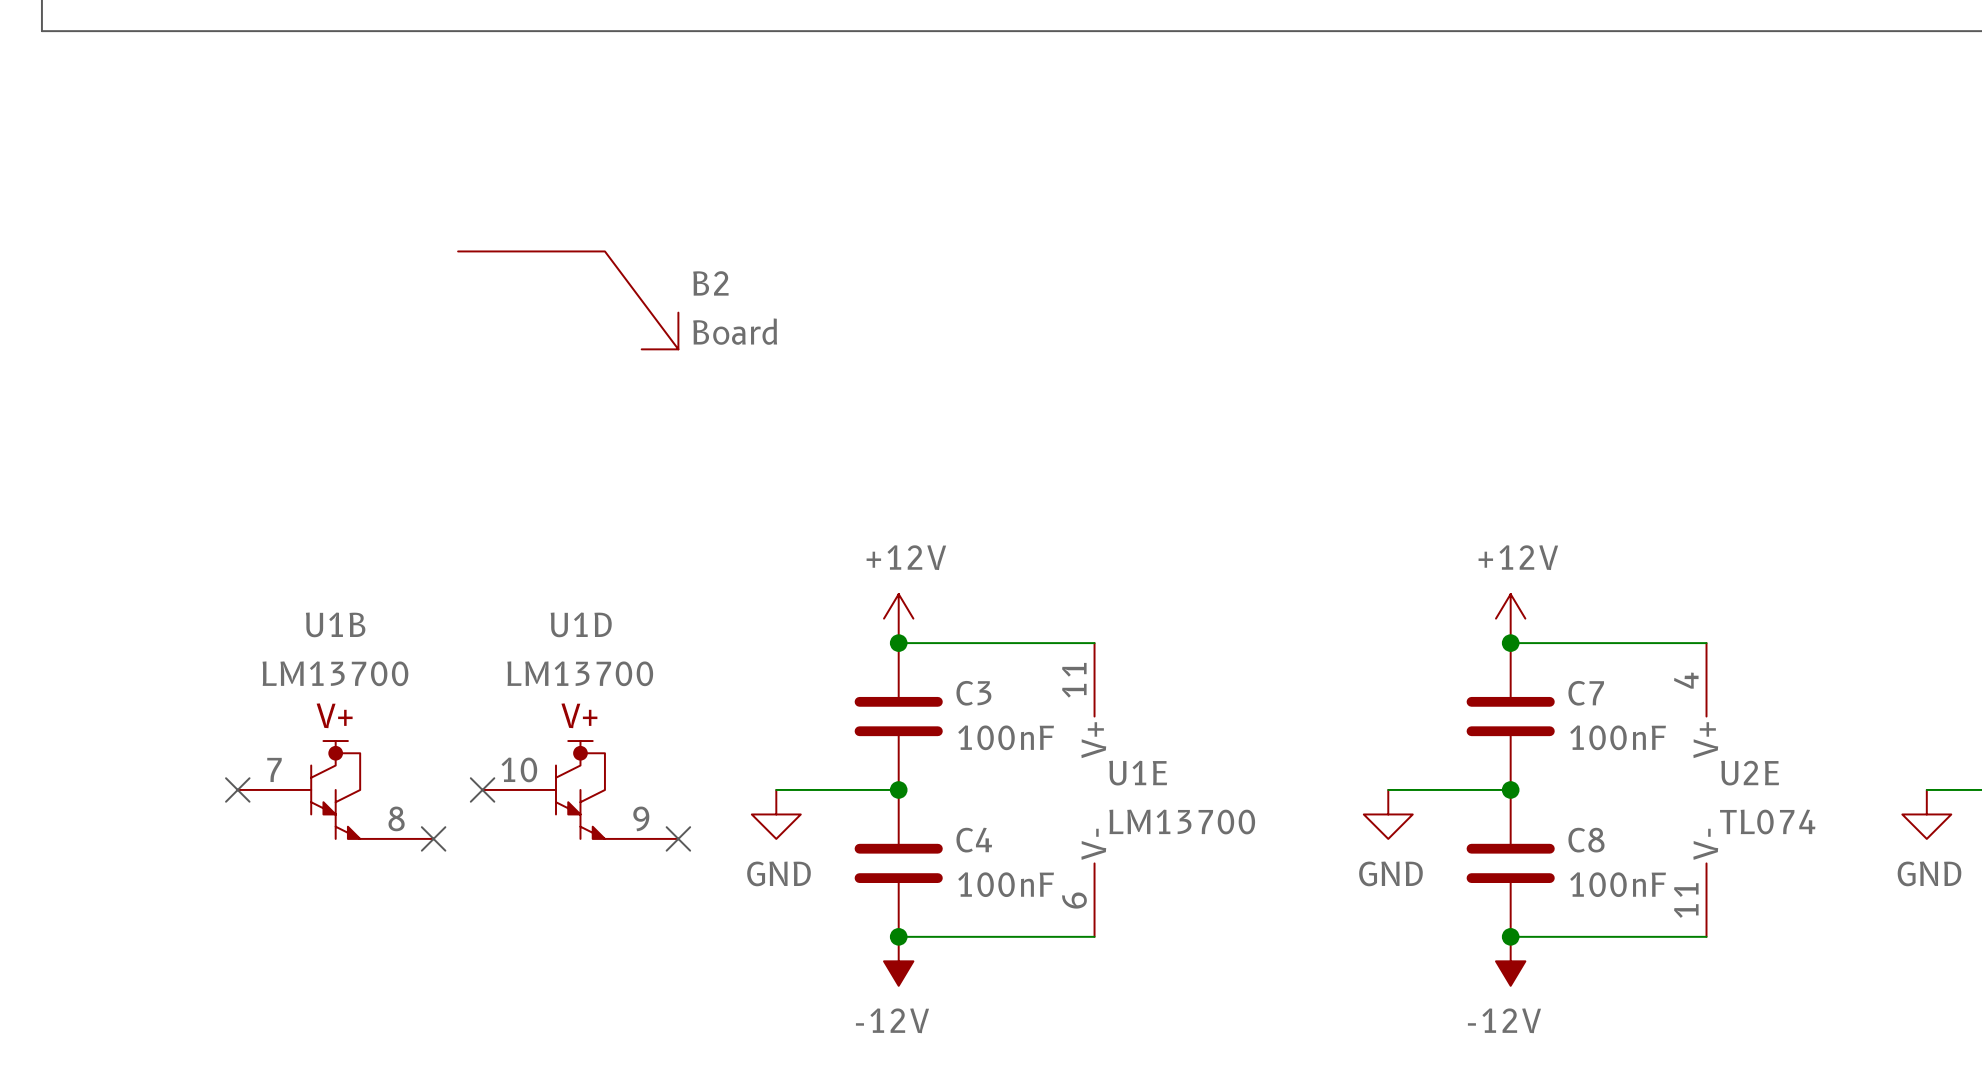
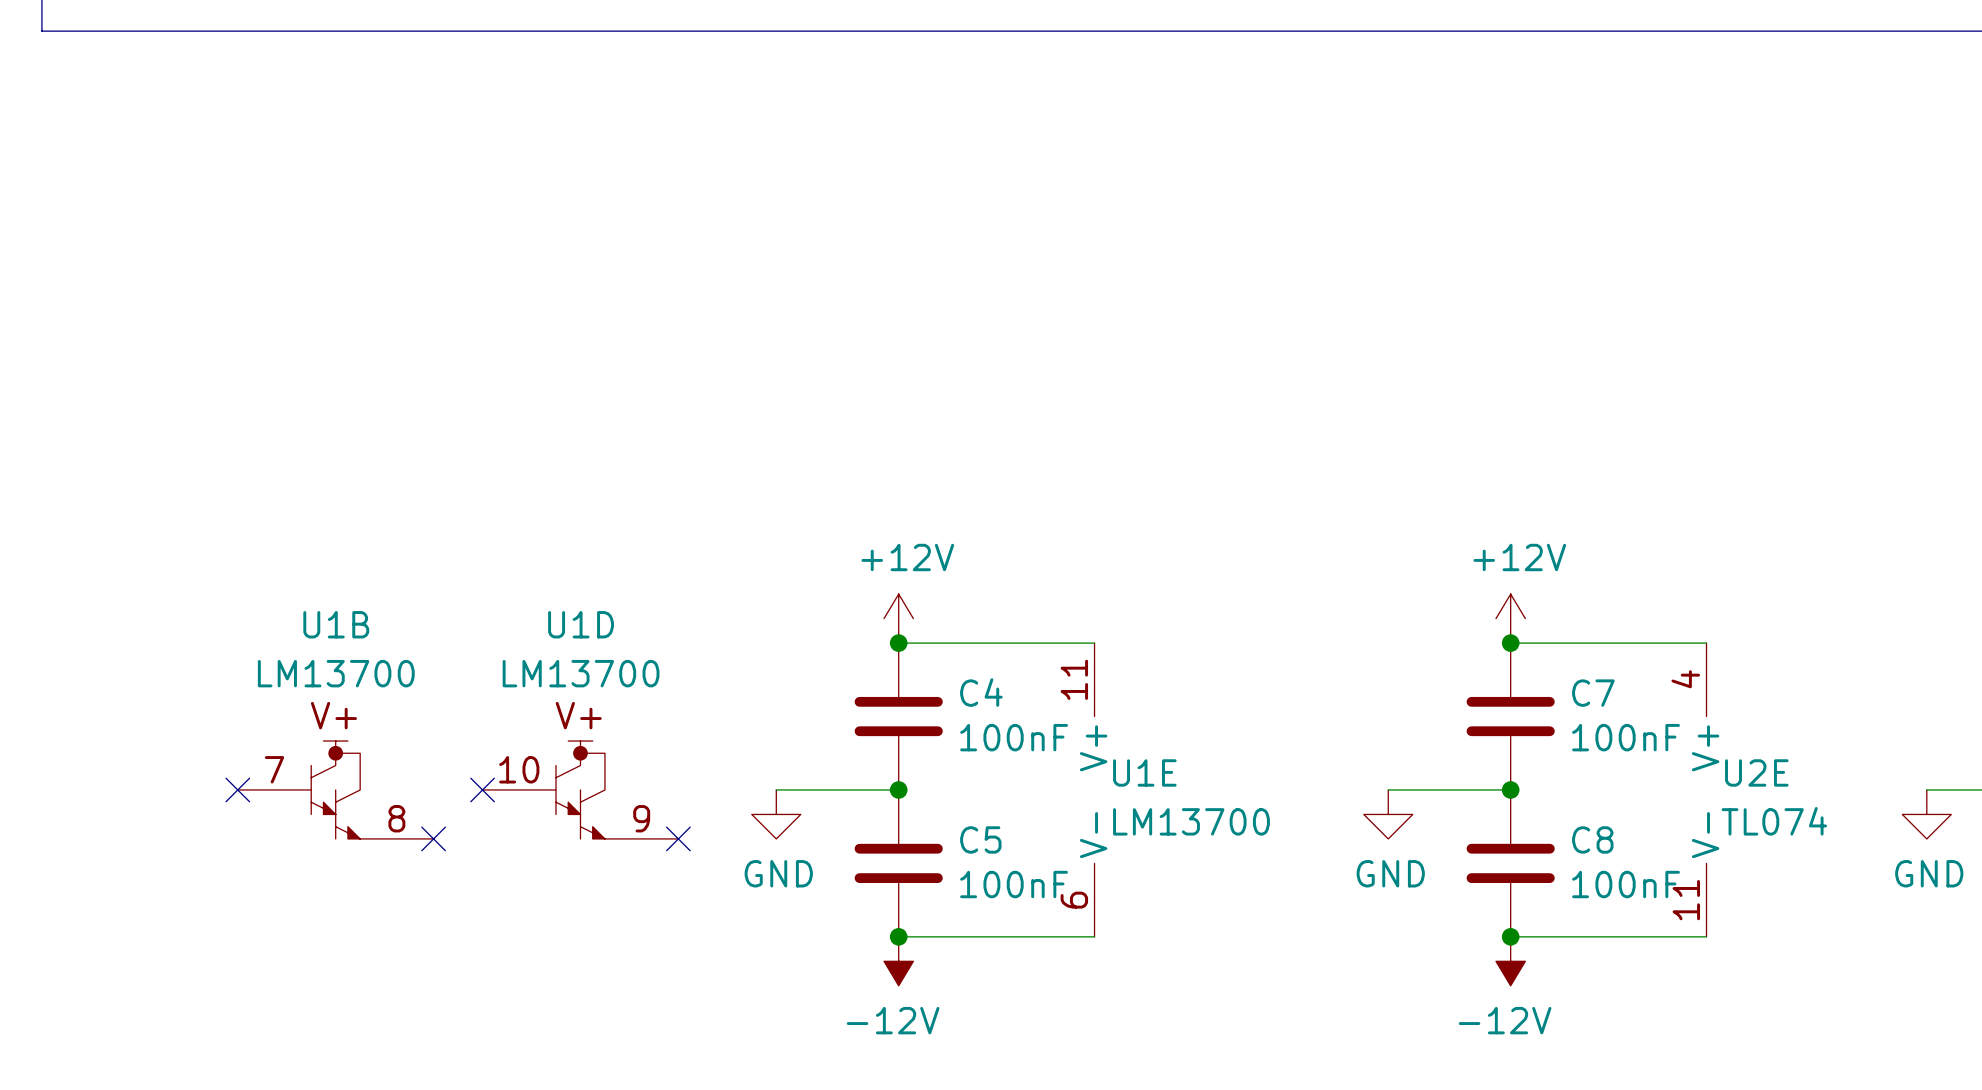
B2: Board (568, 300) -> none
C3 name: C3 (973, 693) -> C4 (981, 692)
C4 name: C4 (974, 840) -> C5 (980, 839)

